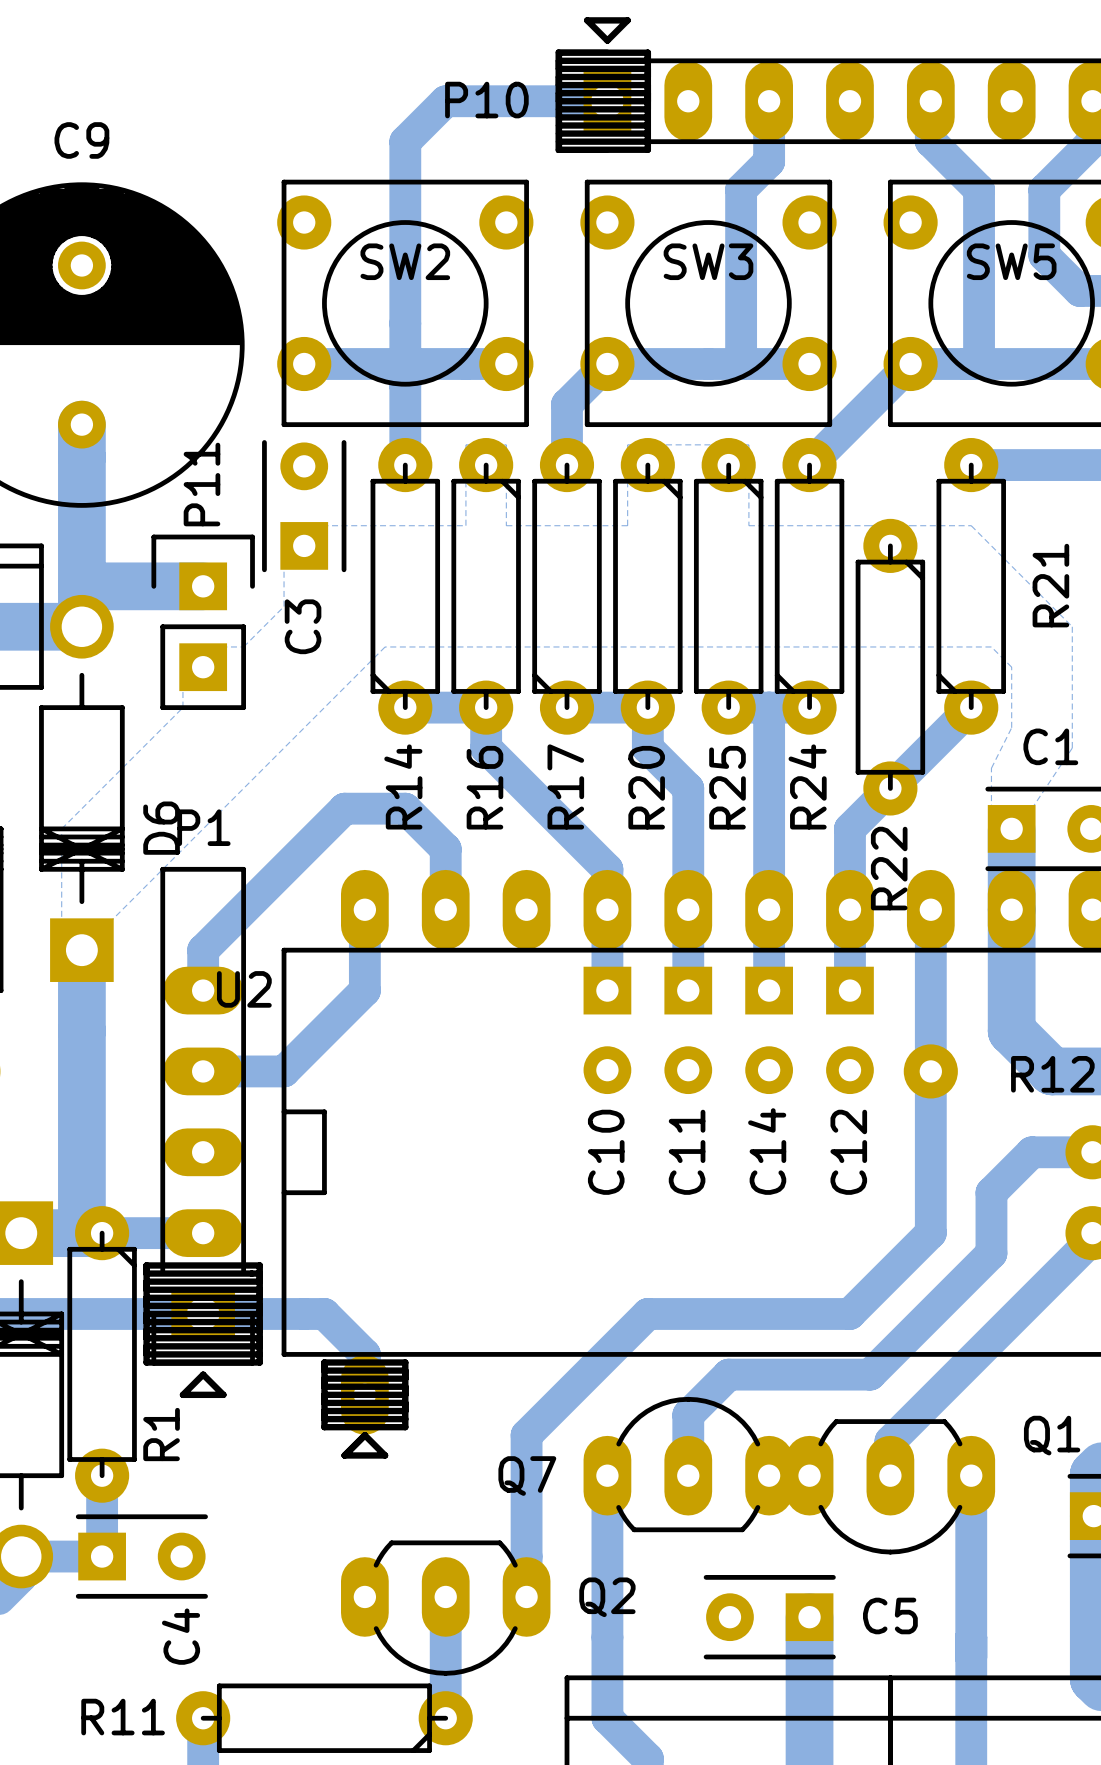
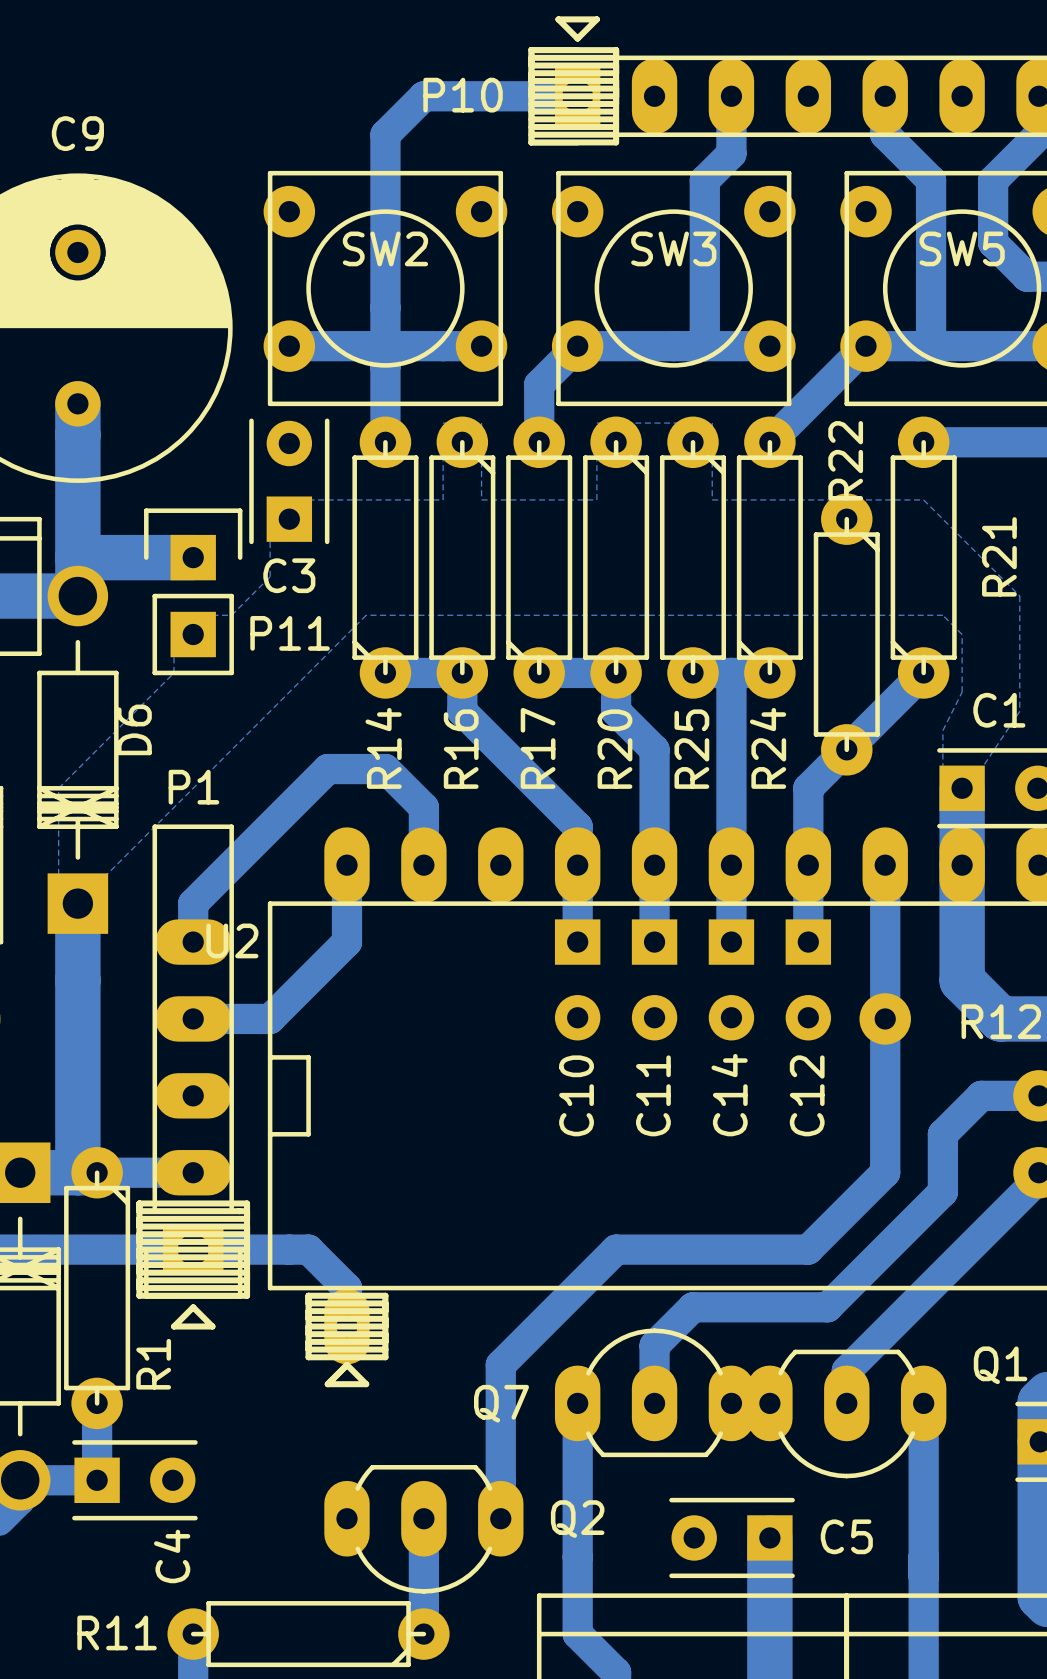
P11 name rotation: 0° (201, 484) -> 90° clockwise (290, 633)
P11 name position: P11 (201, 484) -> P11 (290, 633)
C3 name rotation: 0° (303, 626) -> 90° clockwise (289, 575)
D6 name position: D6 (161, 828) -> D6 (134, 729)
R22 name position: R22 (889, 868) -> R22 (845, 460)

